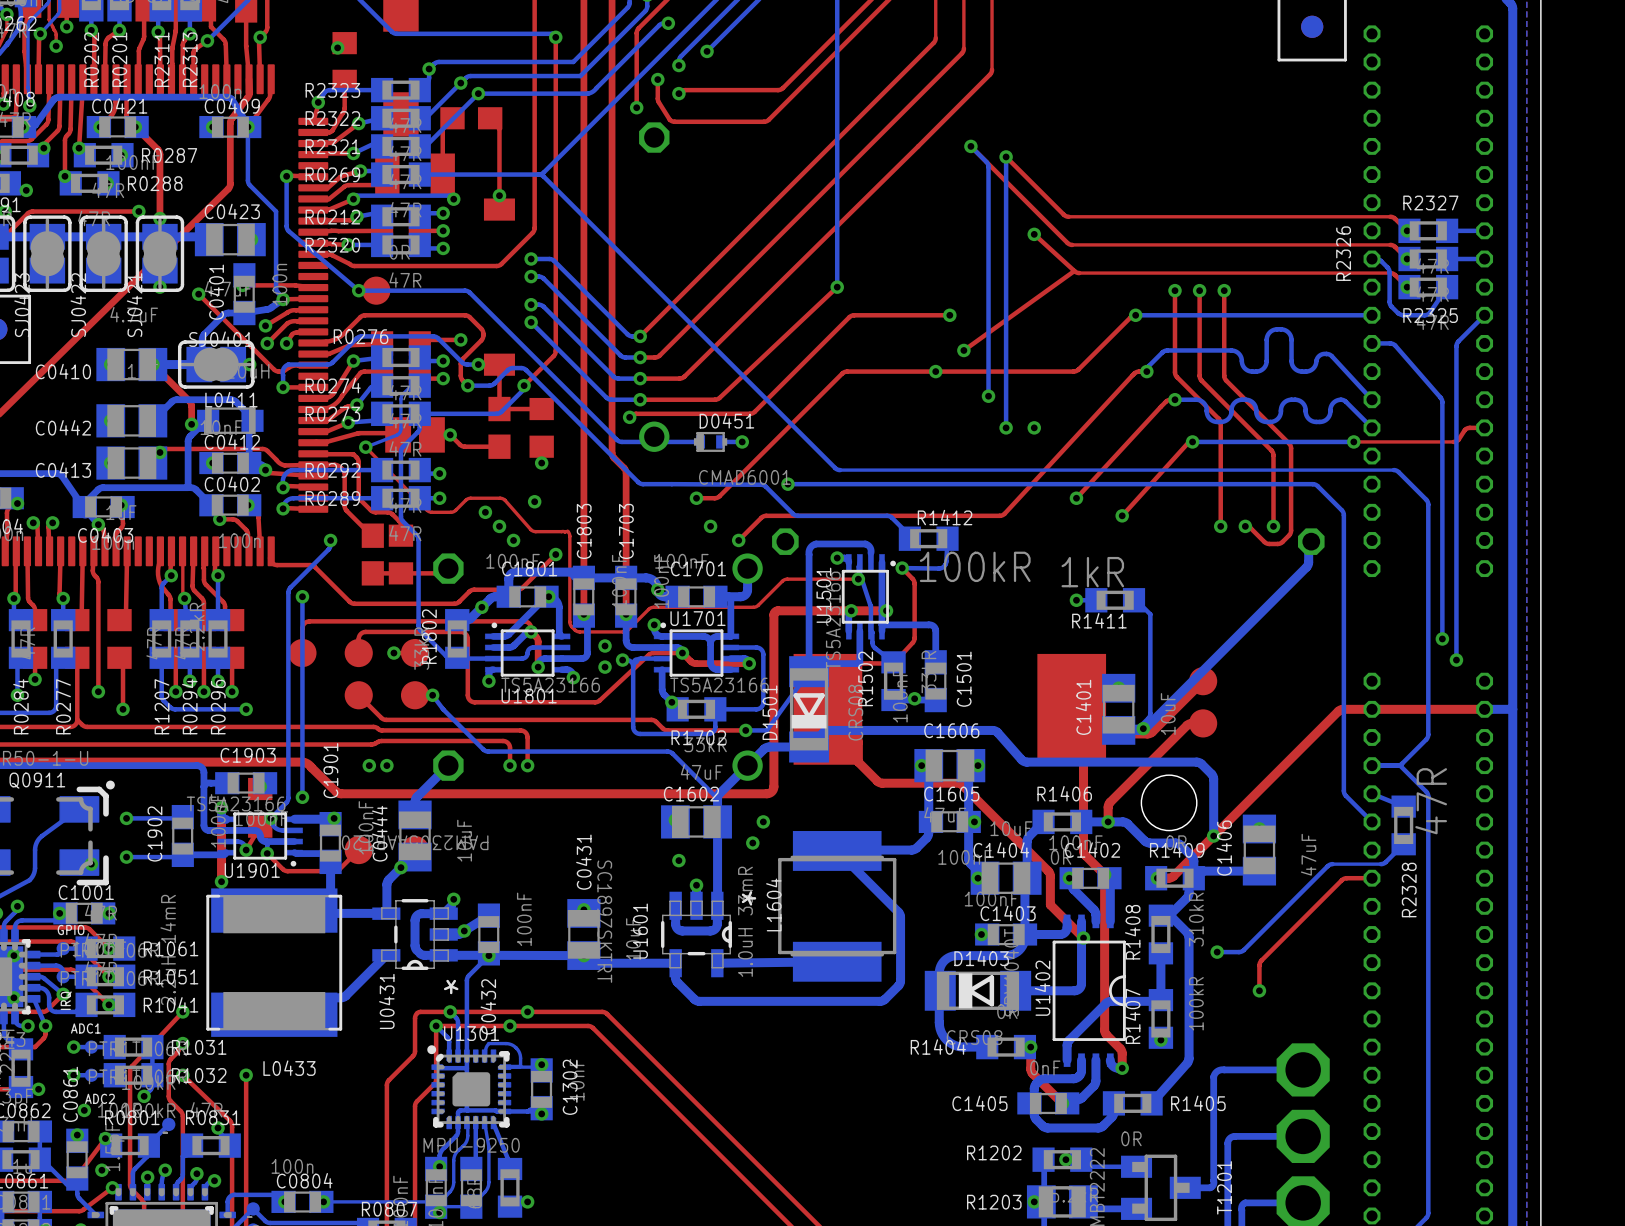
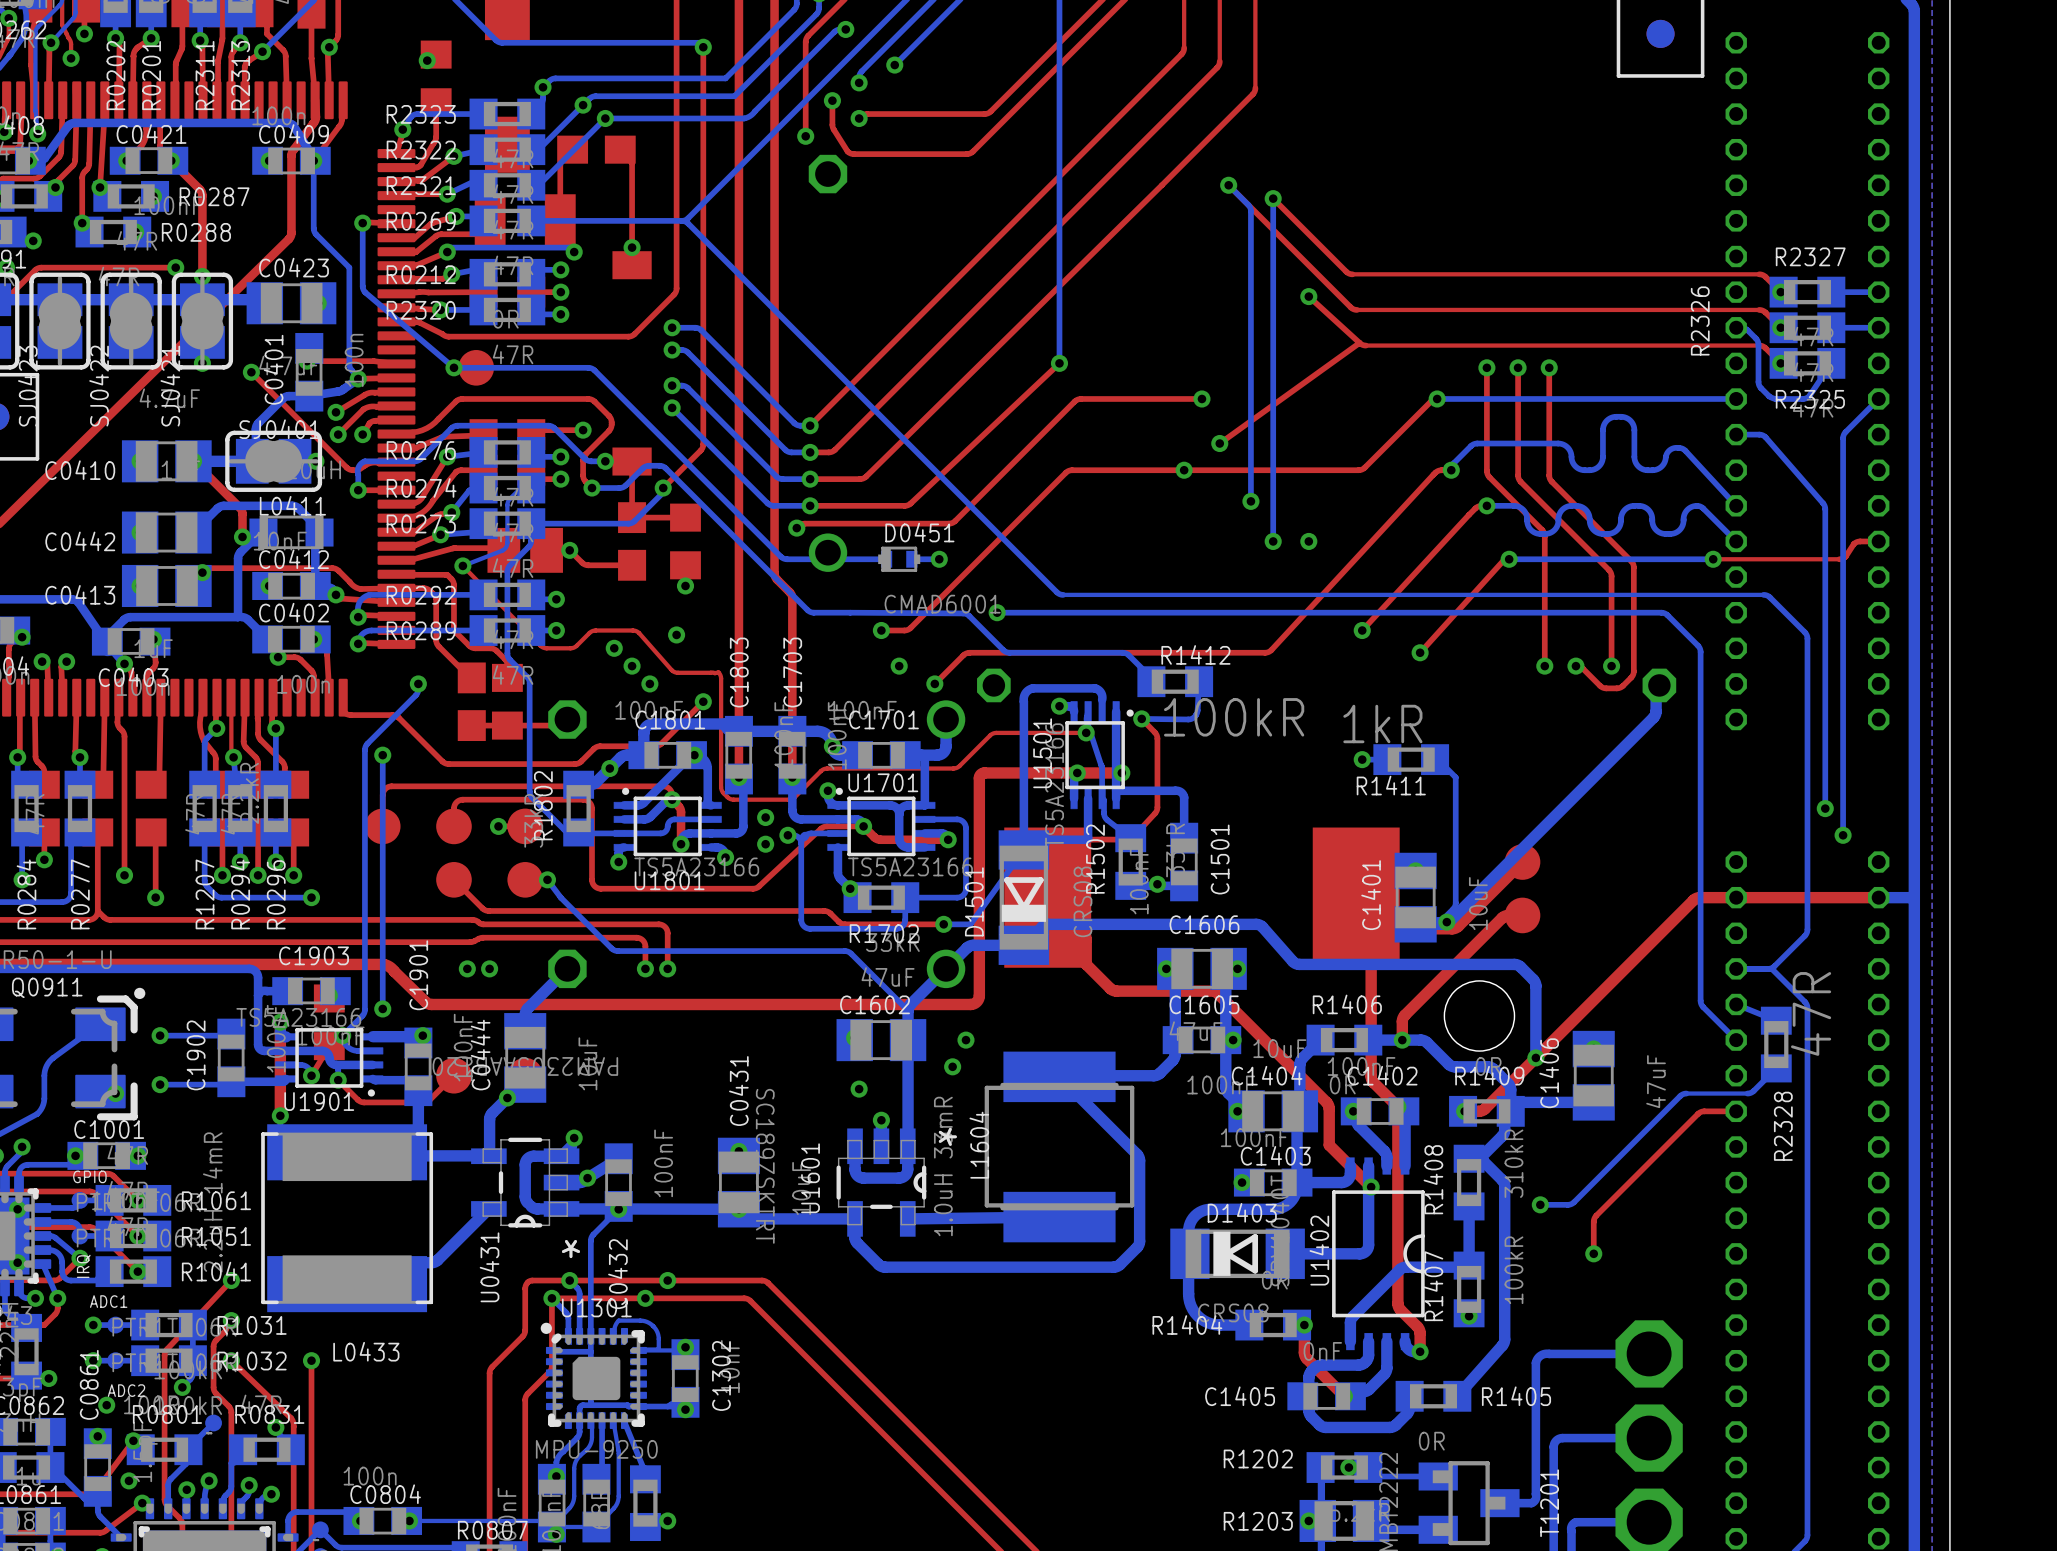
R0276 name position: R0276 (361, 336) -> R0276 (421, 450)

